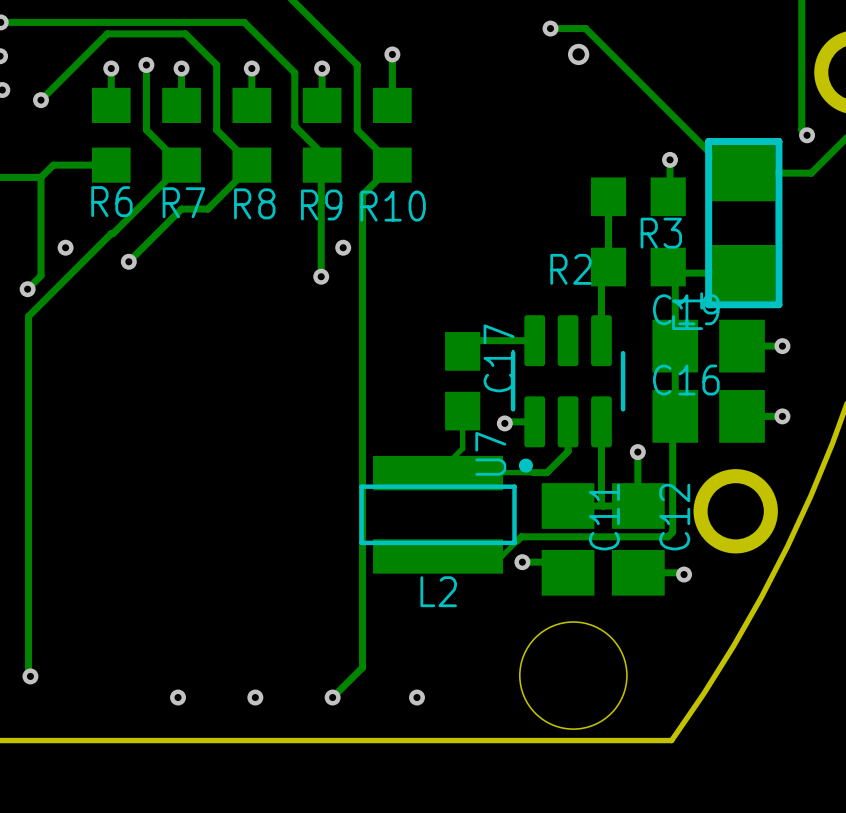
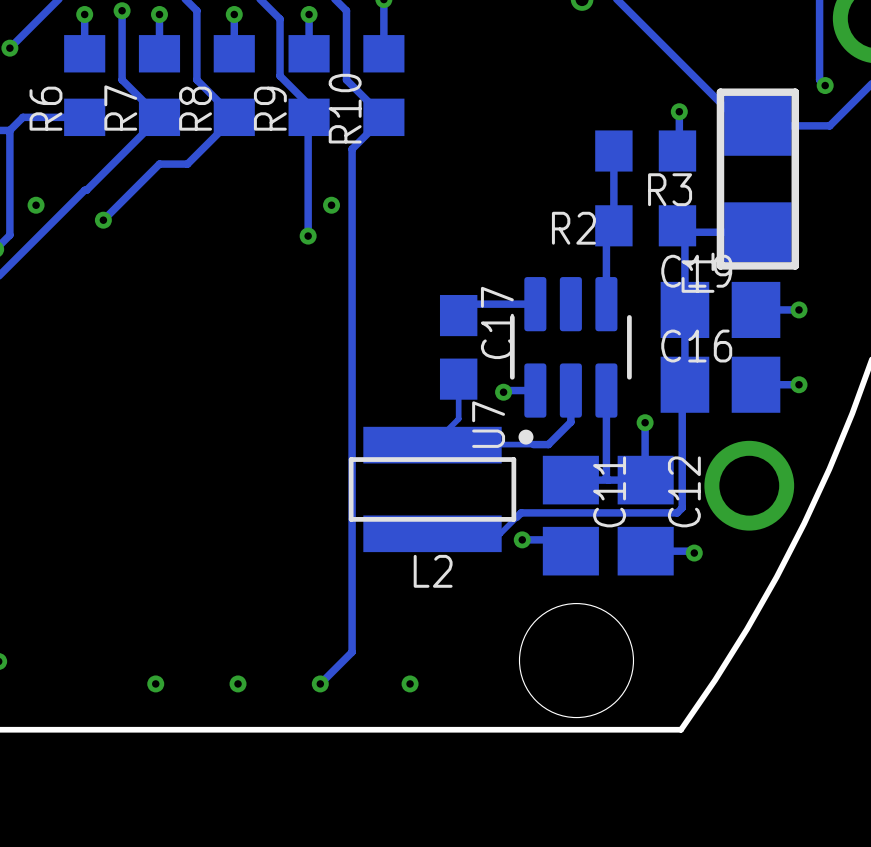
R6 name rotation: 0° (111, 201) -> 90° counterclockwise (45, 108)
R7 name rotation: 0° (183, 202) -> 90° counterclockwise (120, 108)
R8 name rotation: 0° (254, 203) -> 90° counterclockwise (195, 108)
R9 name rotation: 0° (321, 204) -> 90° counterclockwise (270, 108)
R10 name rotation: 0° (393, 206) -> 90° counterclockwise (345, 108)

